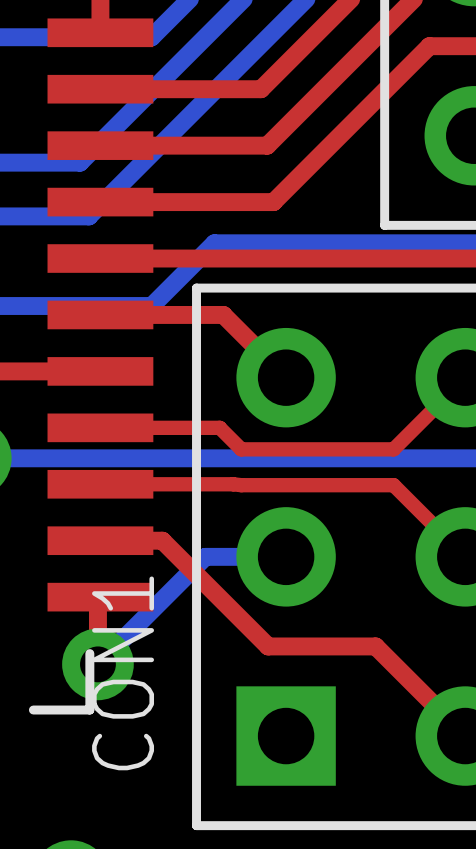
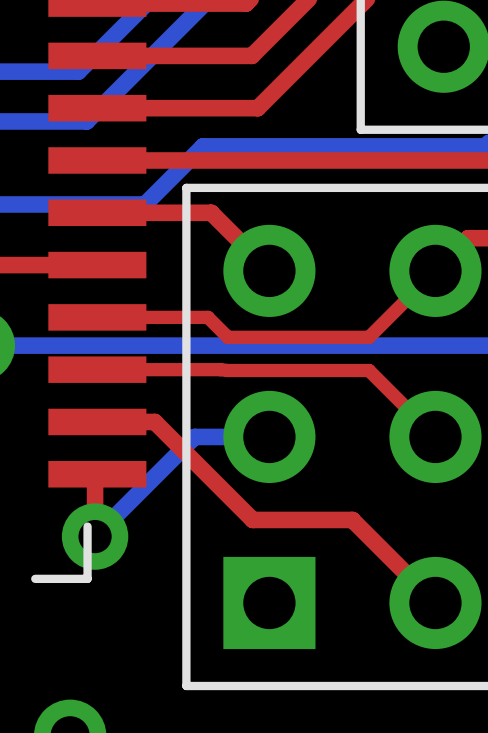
CON1 name: CON1 (123, 673) -> none

